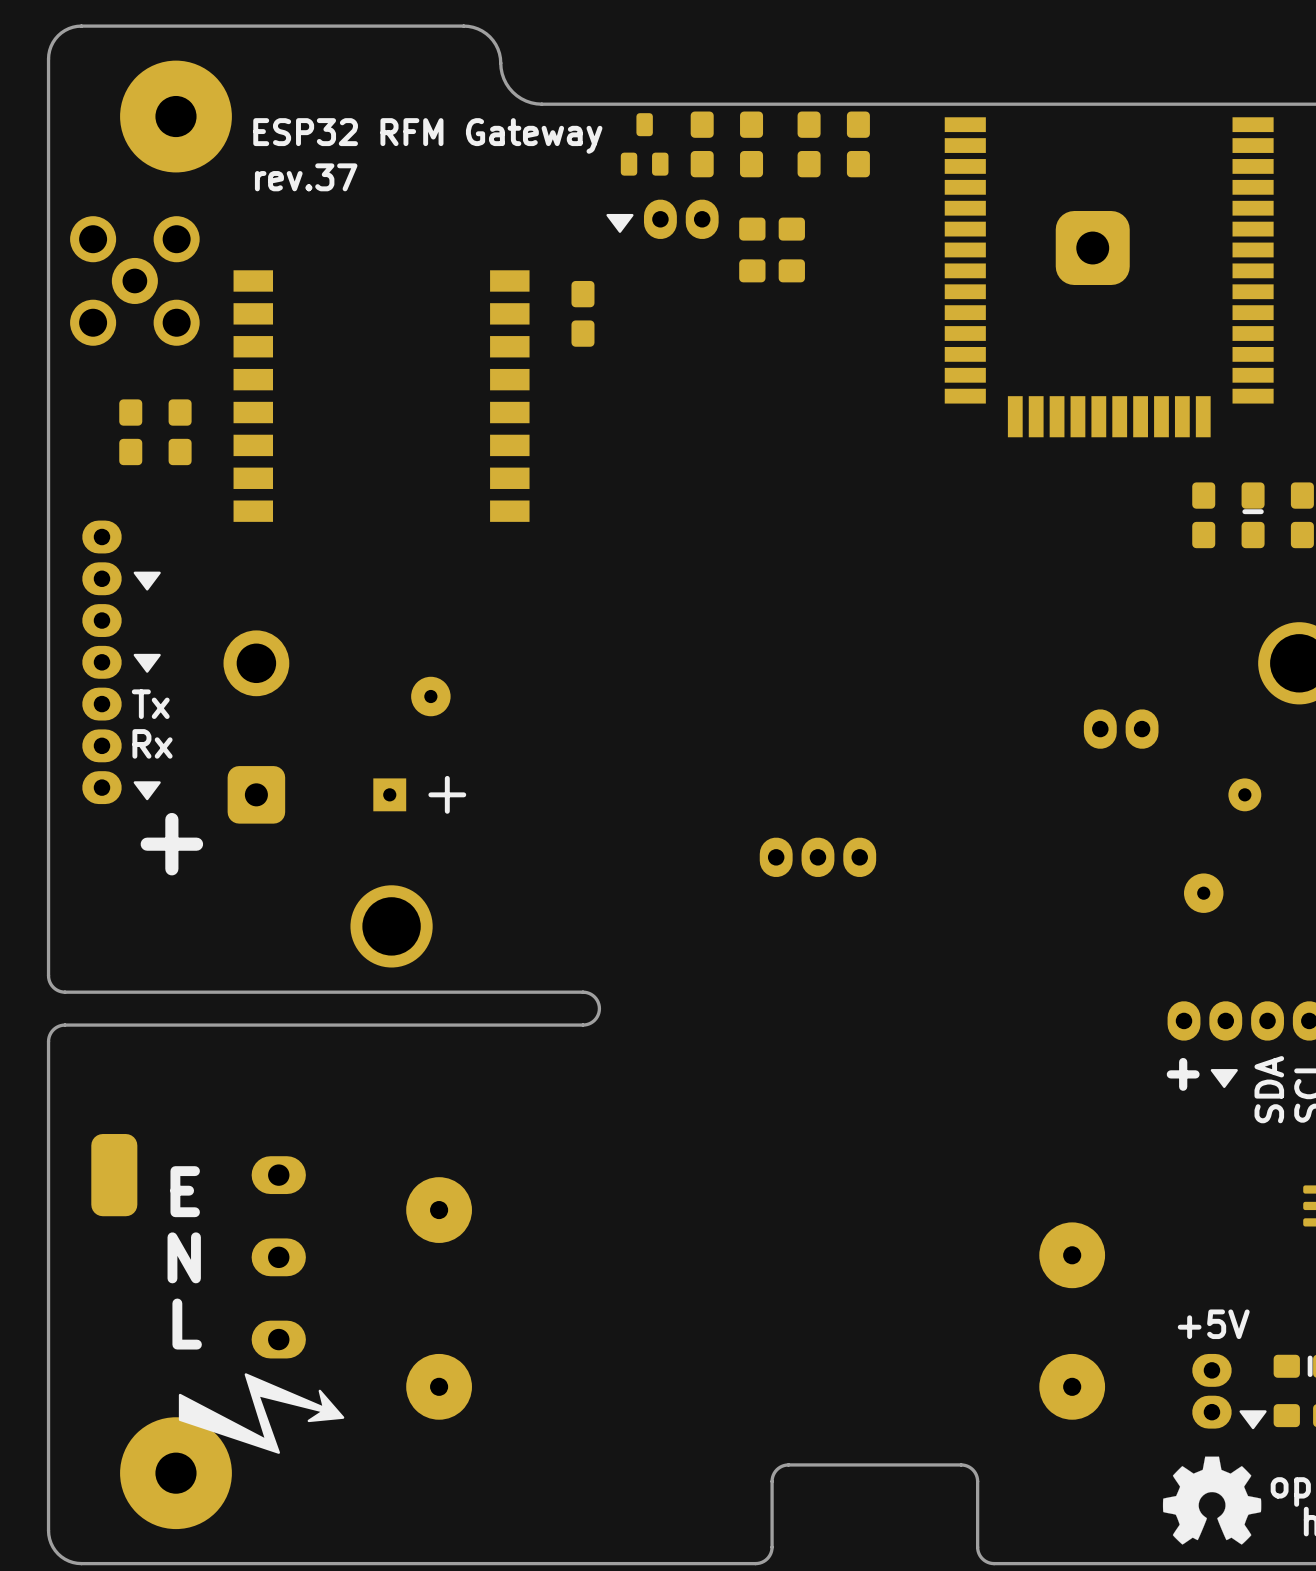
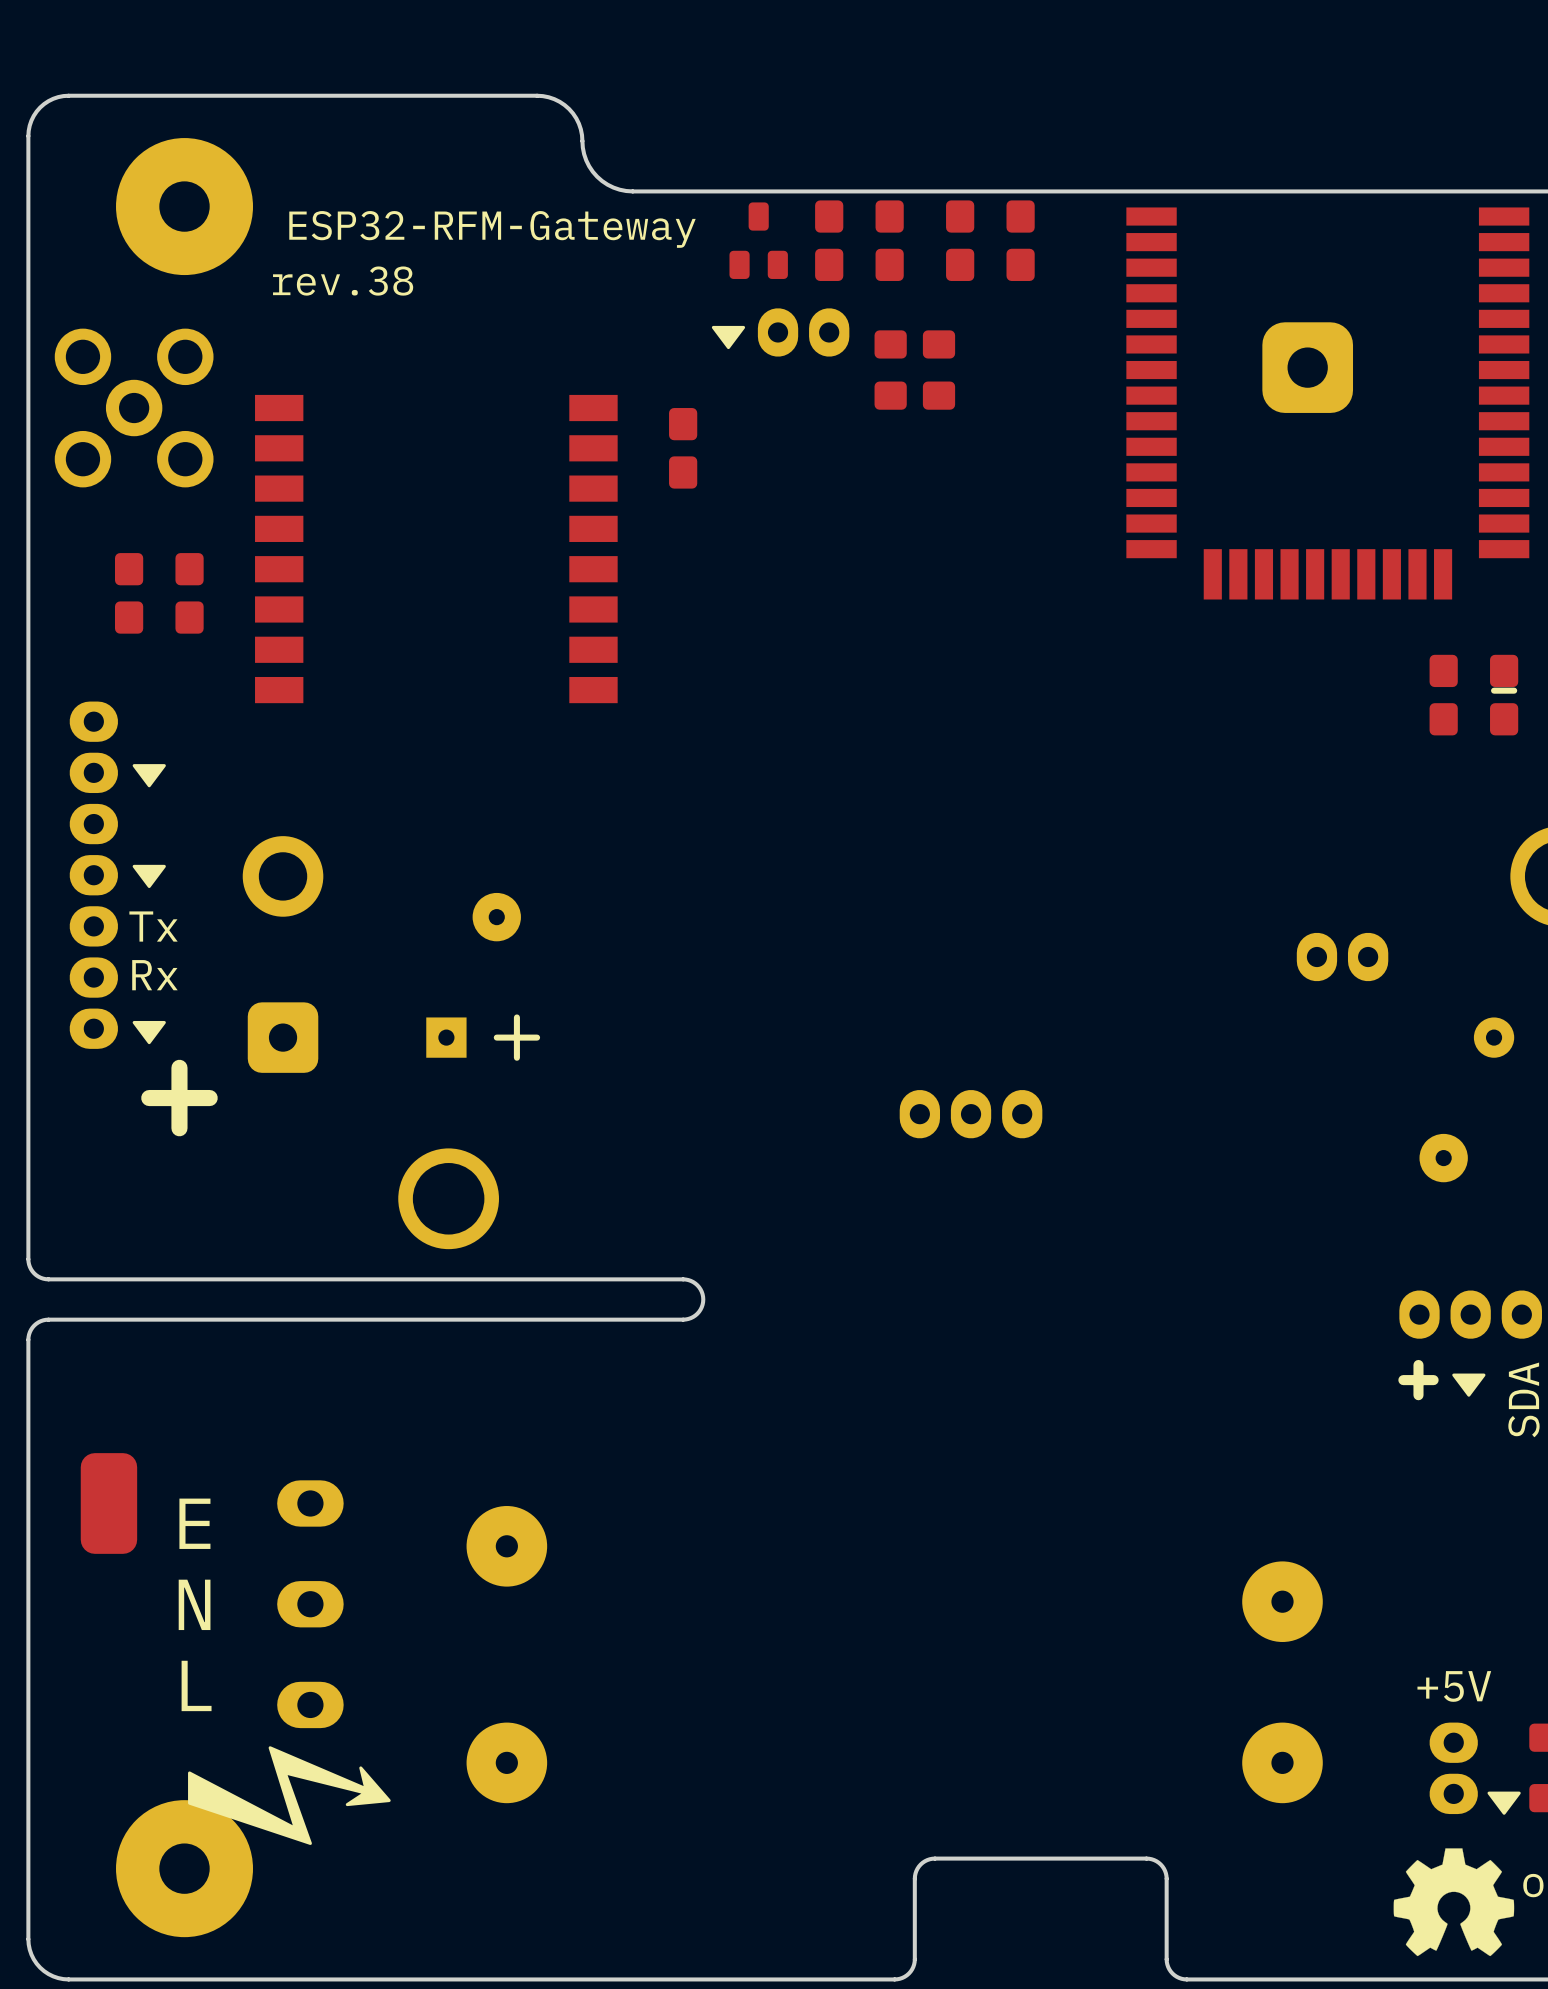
drawing shape: [253, 118, 603, 154] -> [289, 211, 696, 248]
text: rev.37 (306, 177) -> rev.38 (343, 281)

